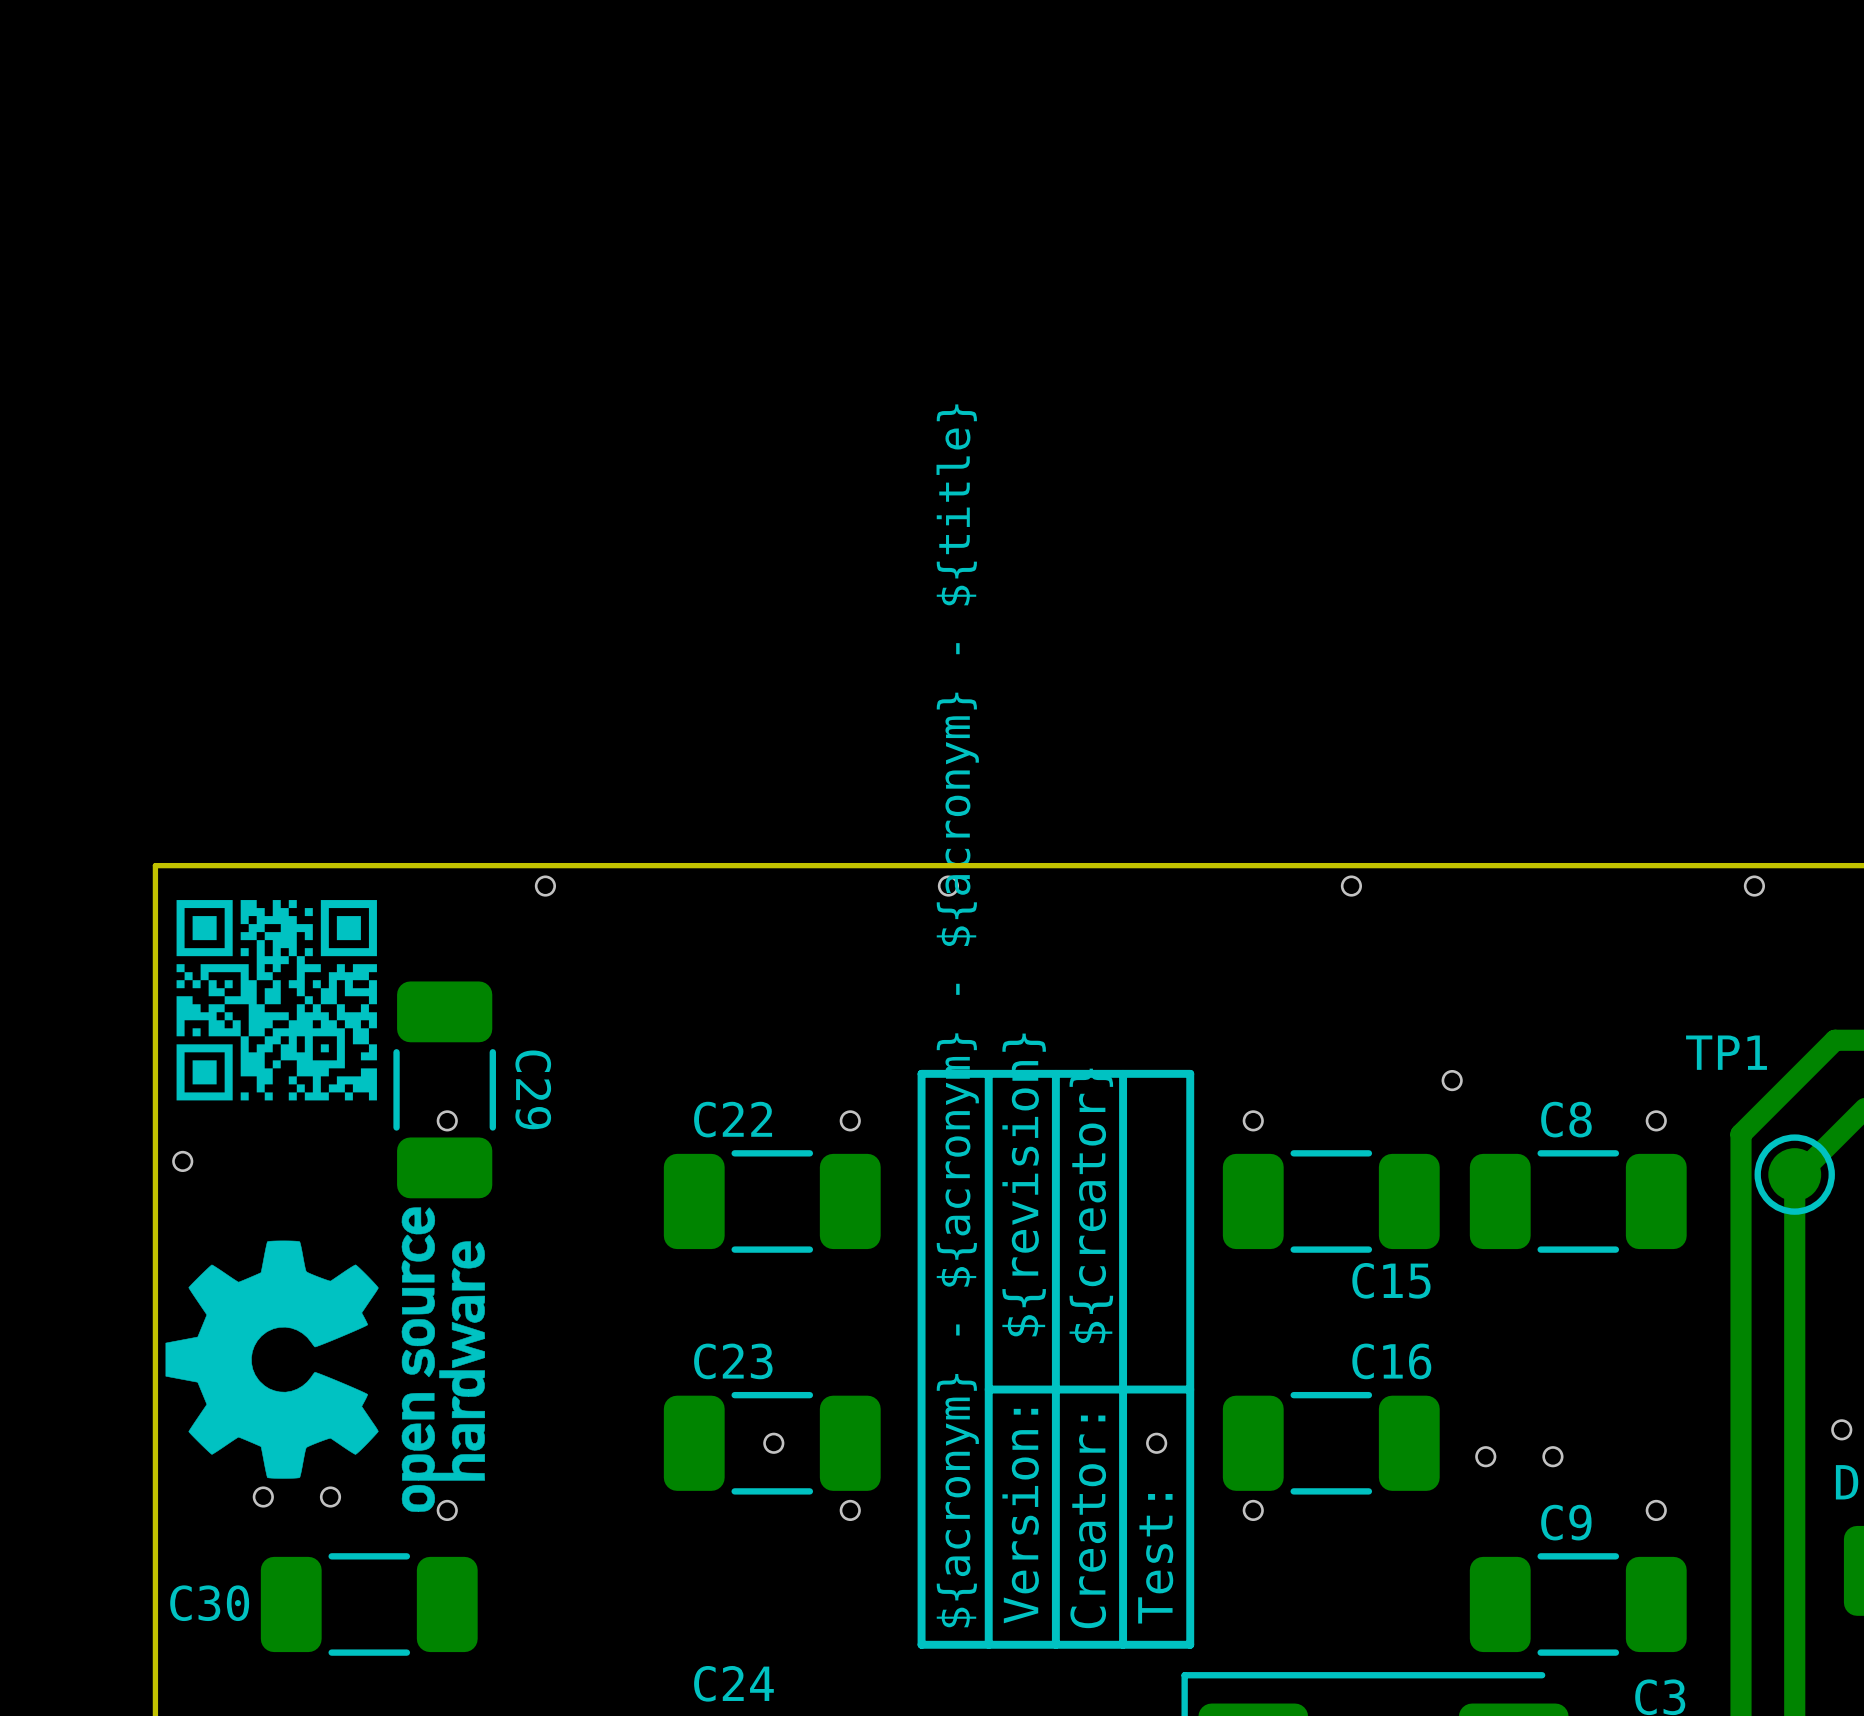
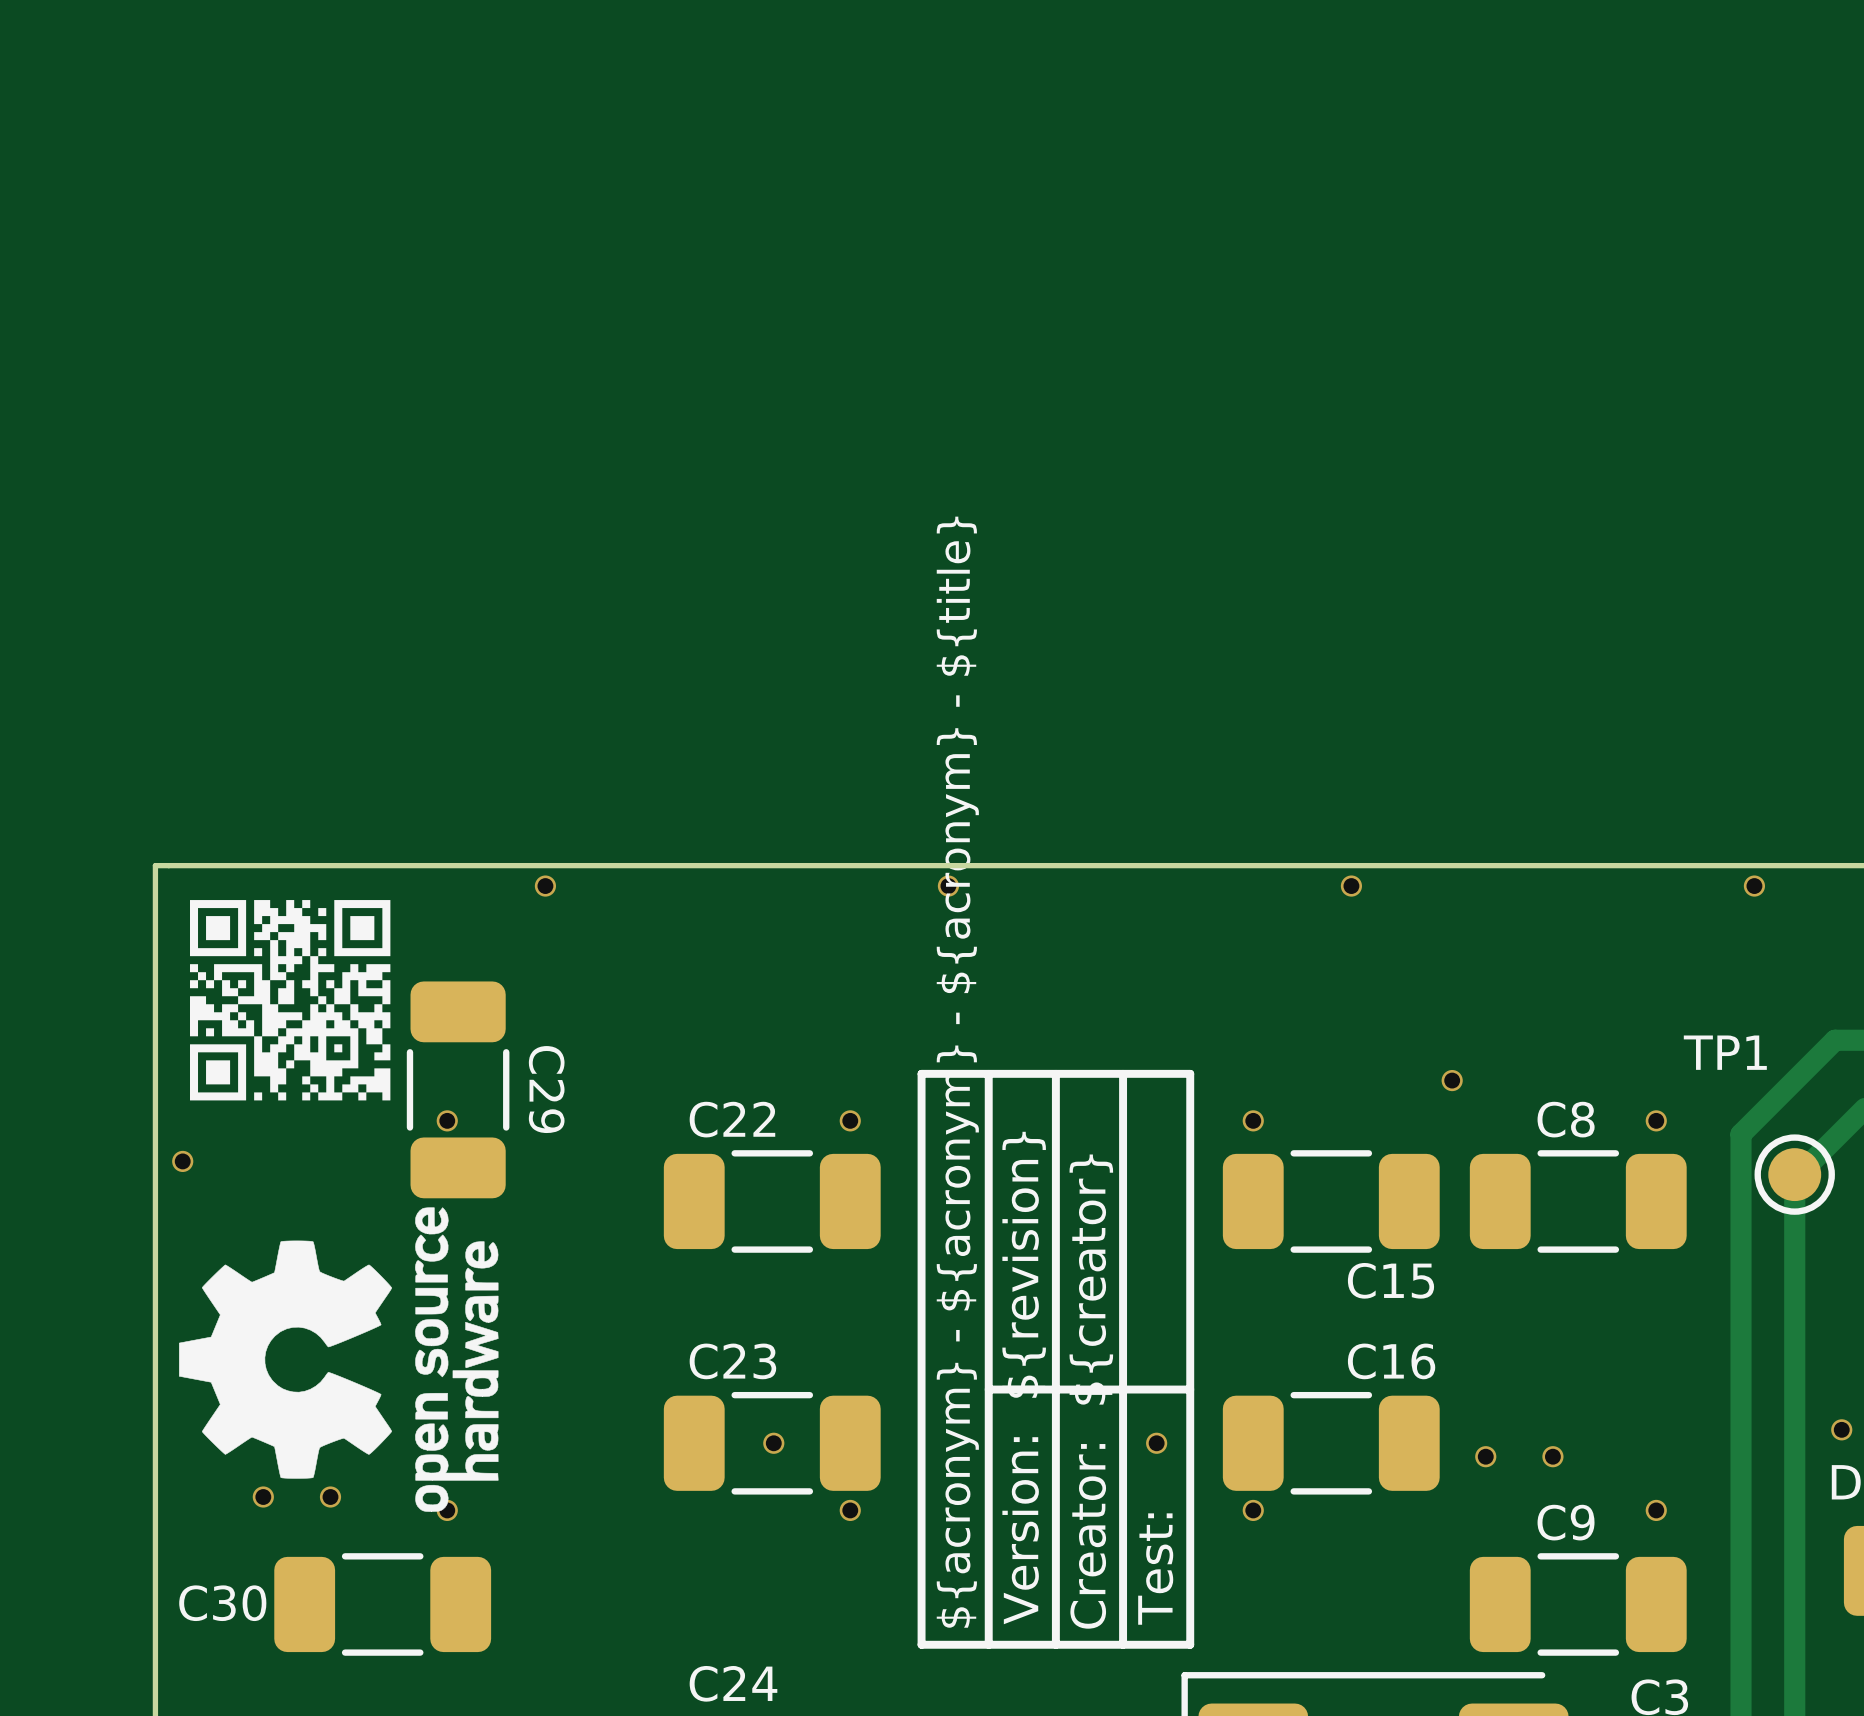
drawing position: (276, 1000) -> (290, 1000)
C29 position: (444, 1089) -> (458, 1089)
drawing position: (325, 1359) -> (338, 1359)
C30 position: (369, 1604) -> (382, 1604)

